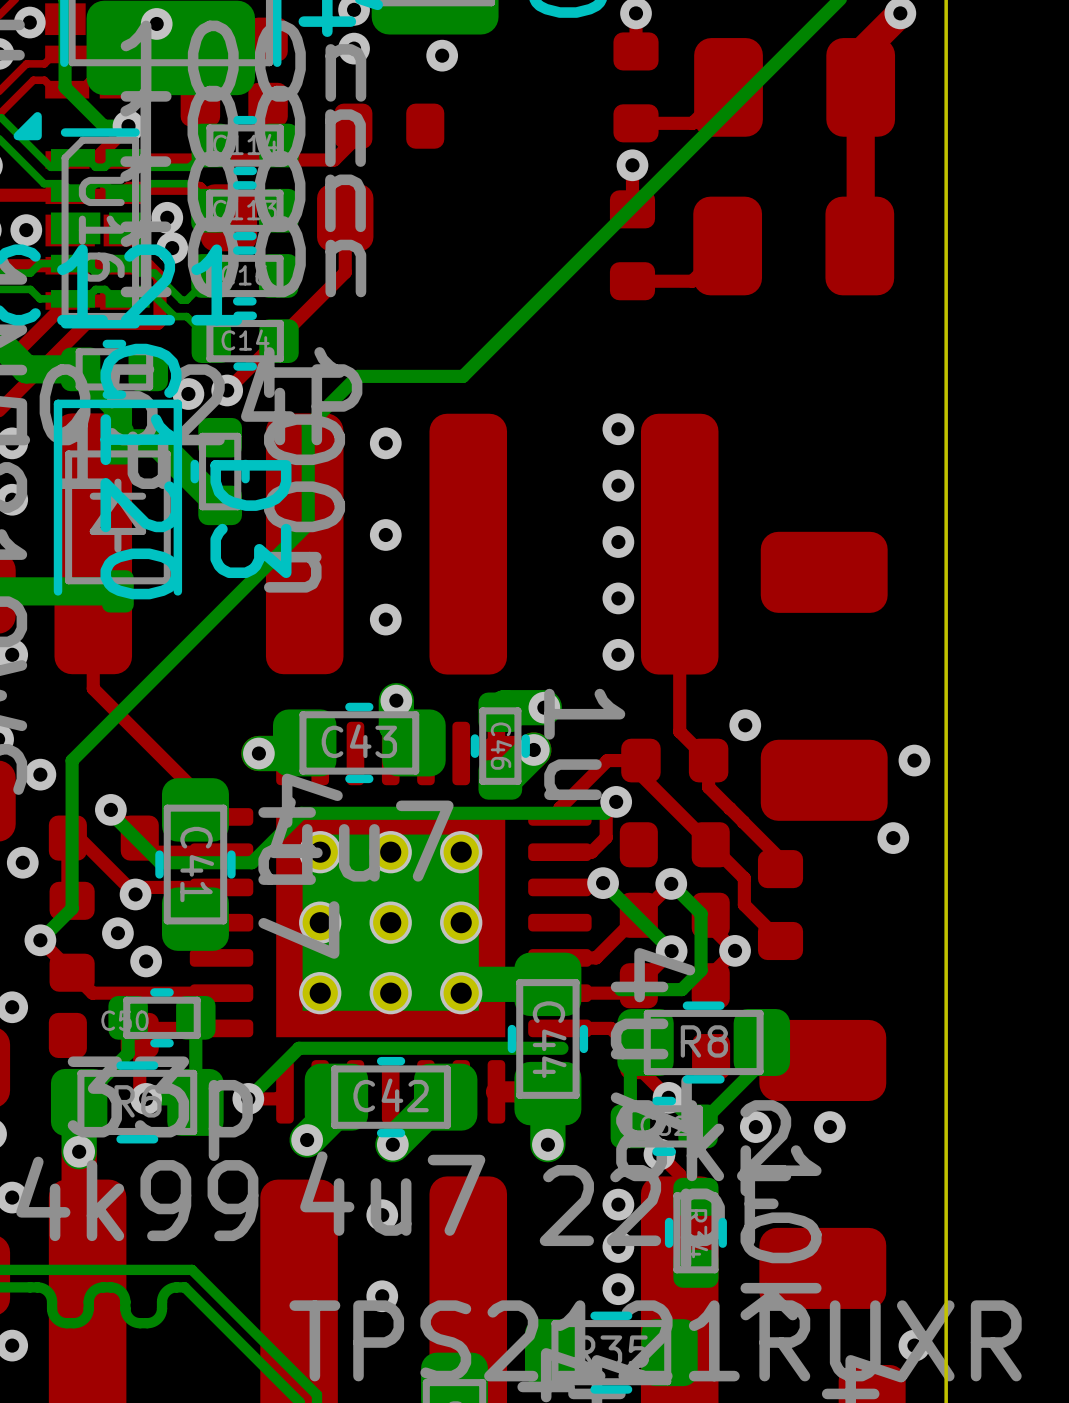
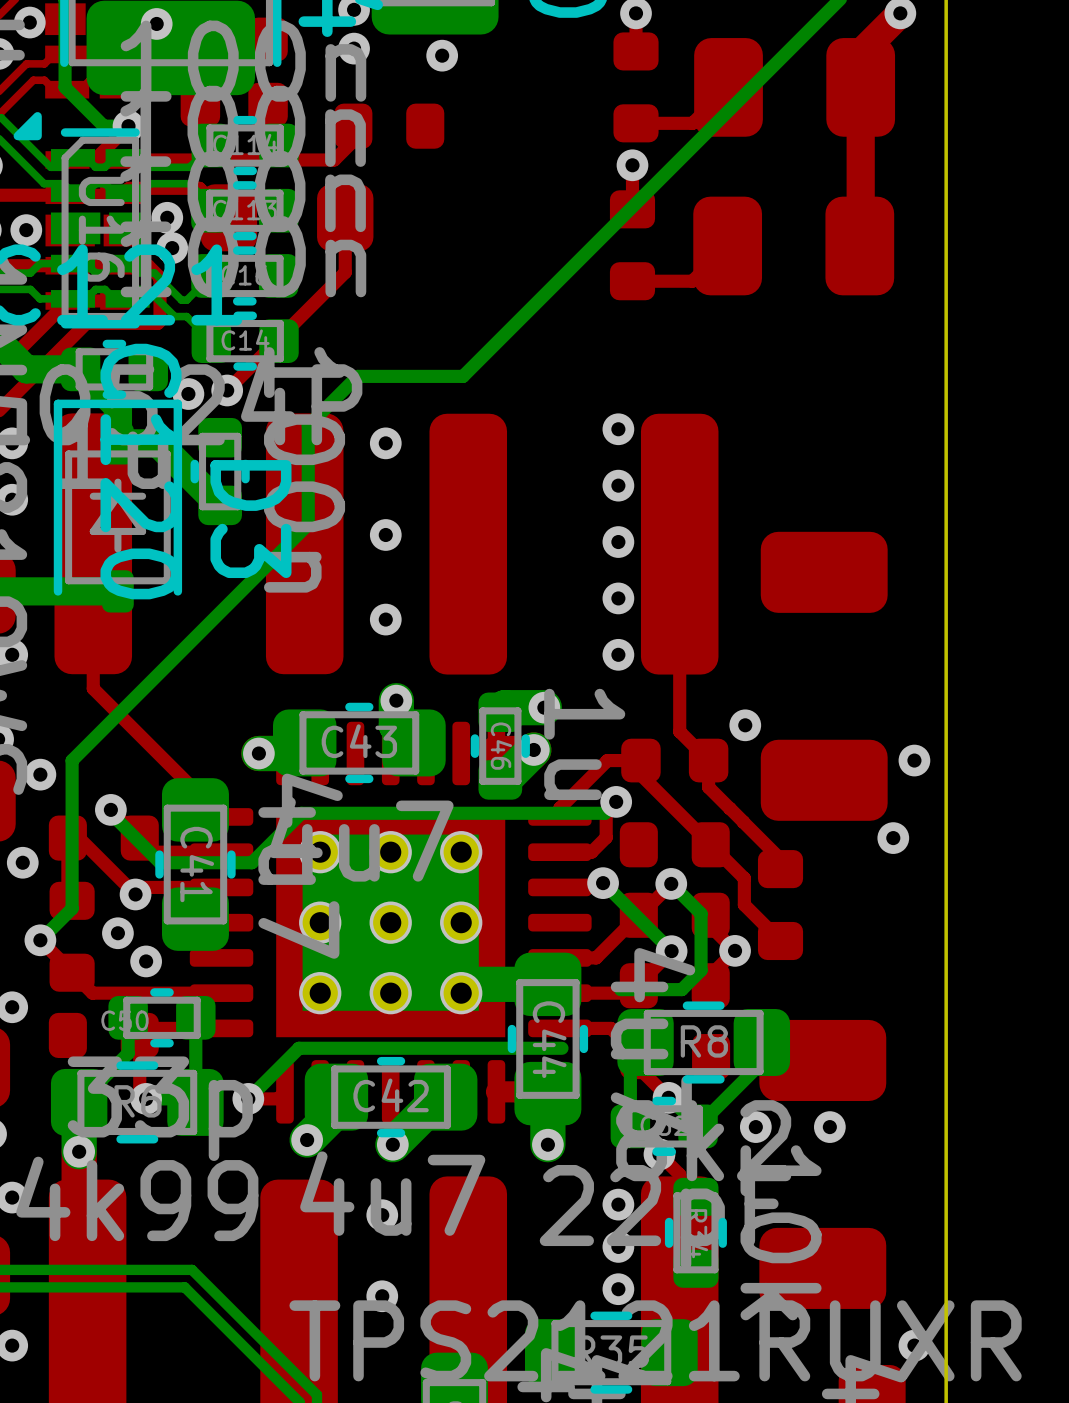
bottom track: (103, 1287) (96, 1289) (90, 1294) (85, 1317) (74, 1323) (62, 1322) (56, 1318) (52, 1312) (50, 1294) (44, 1289) (37, 1287) -> (103, 1287) (37, 1287)
bottom track: (176, 1287) (165, 1293) (160, 1315) (154, 1321) (147, 1323) (136, 1322) (129, 1318) (125, 1312) (123, 1294) (118, 1289) (110, 1287) -> (176, 1287) (110, 1287)

